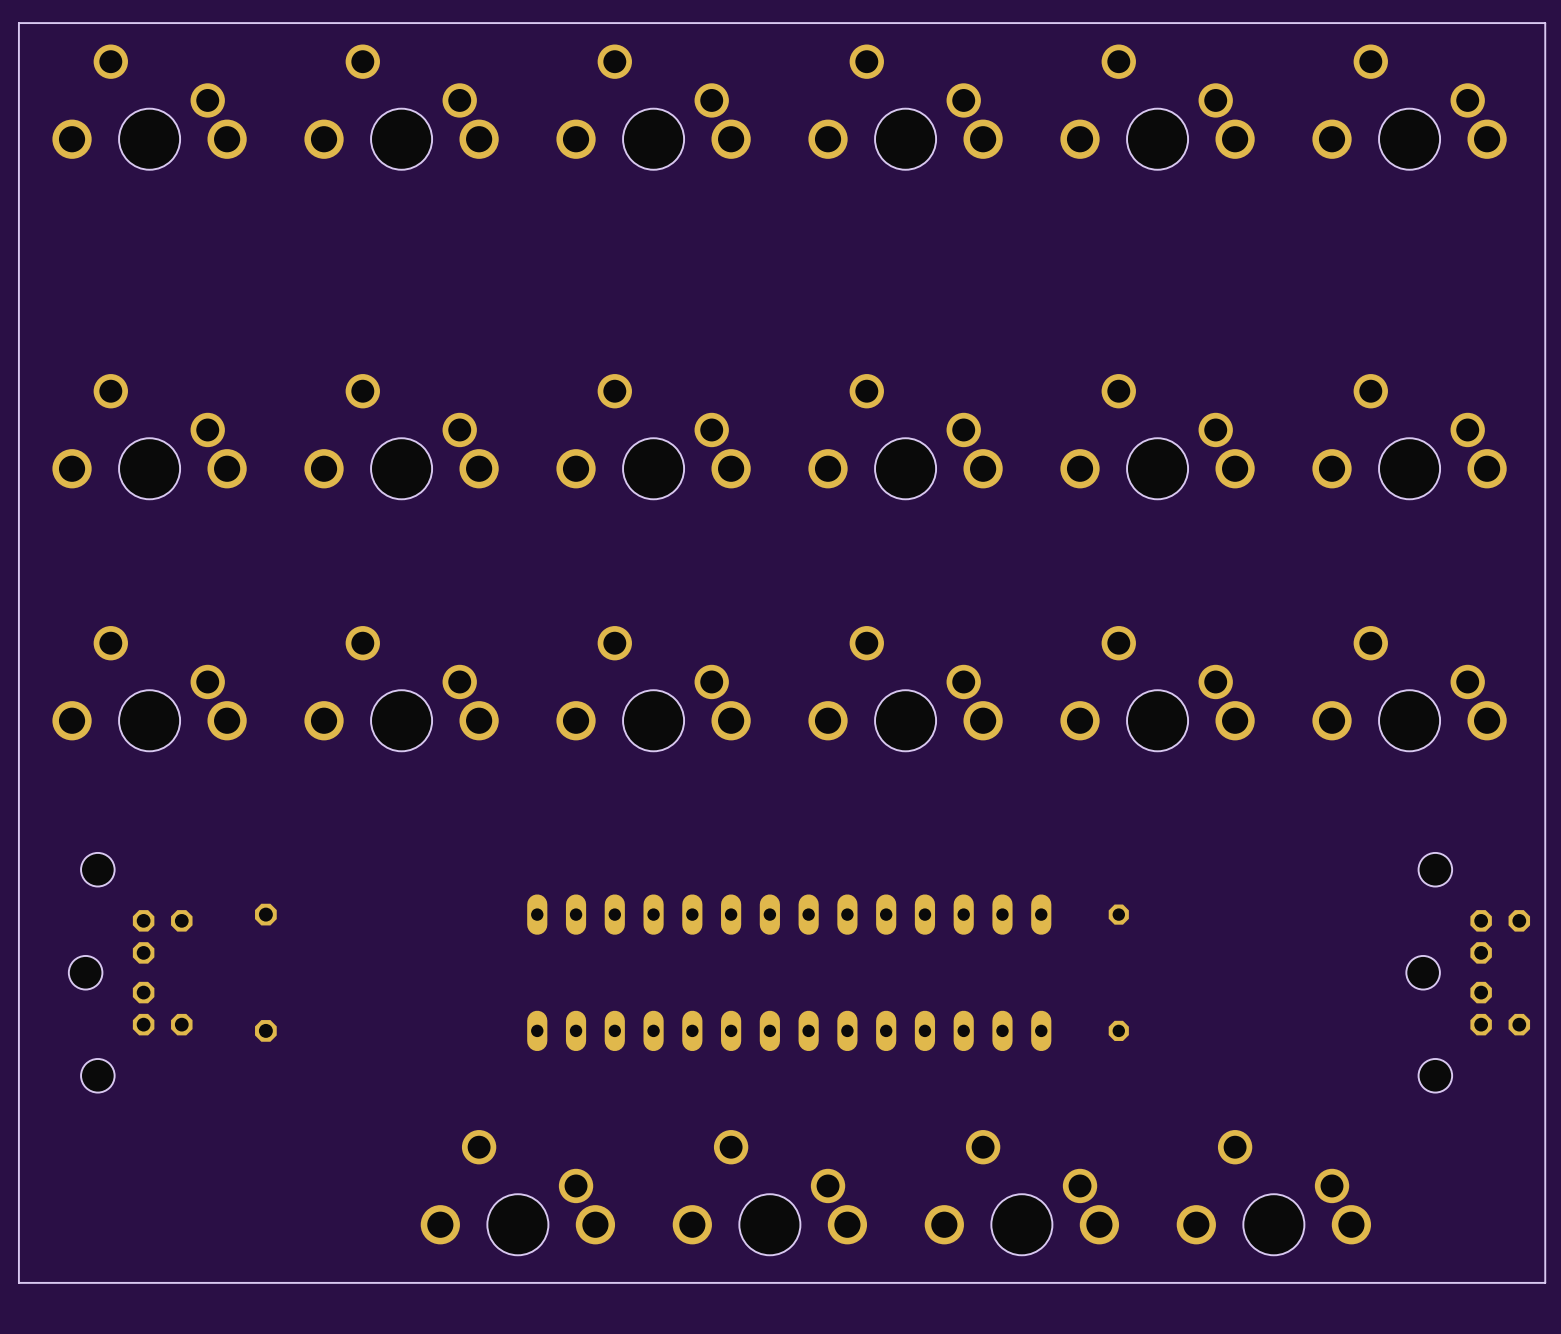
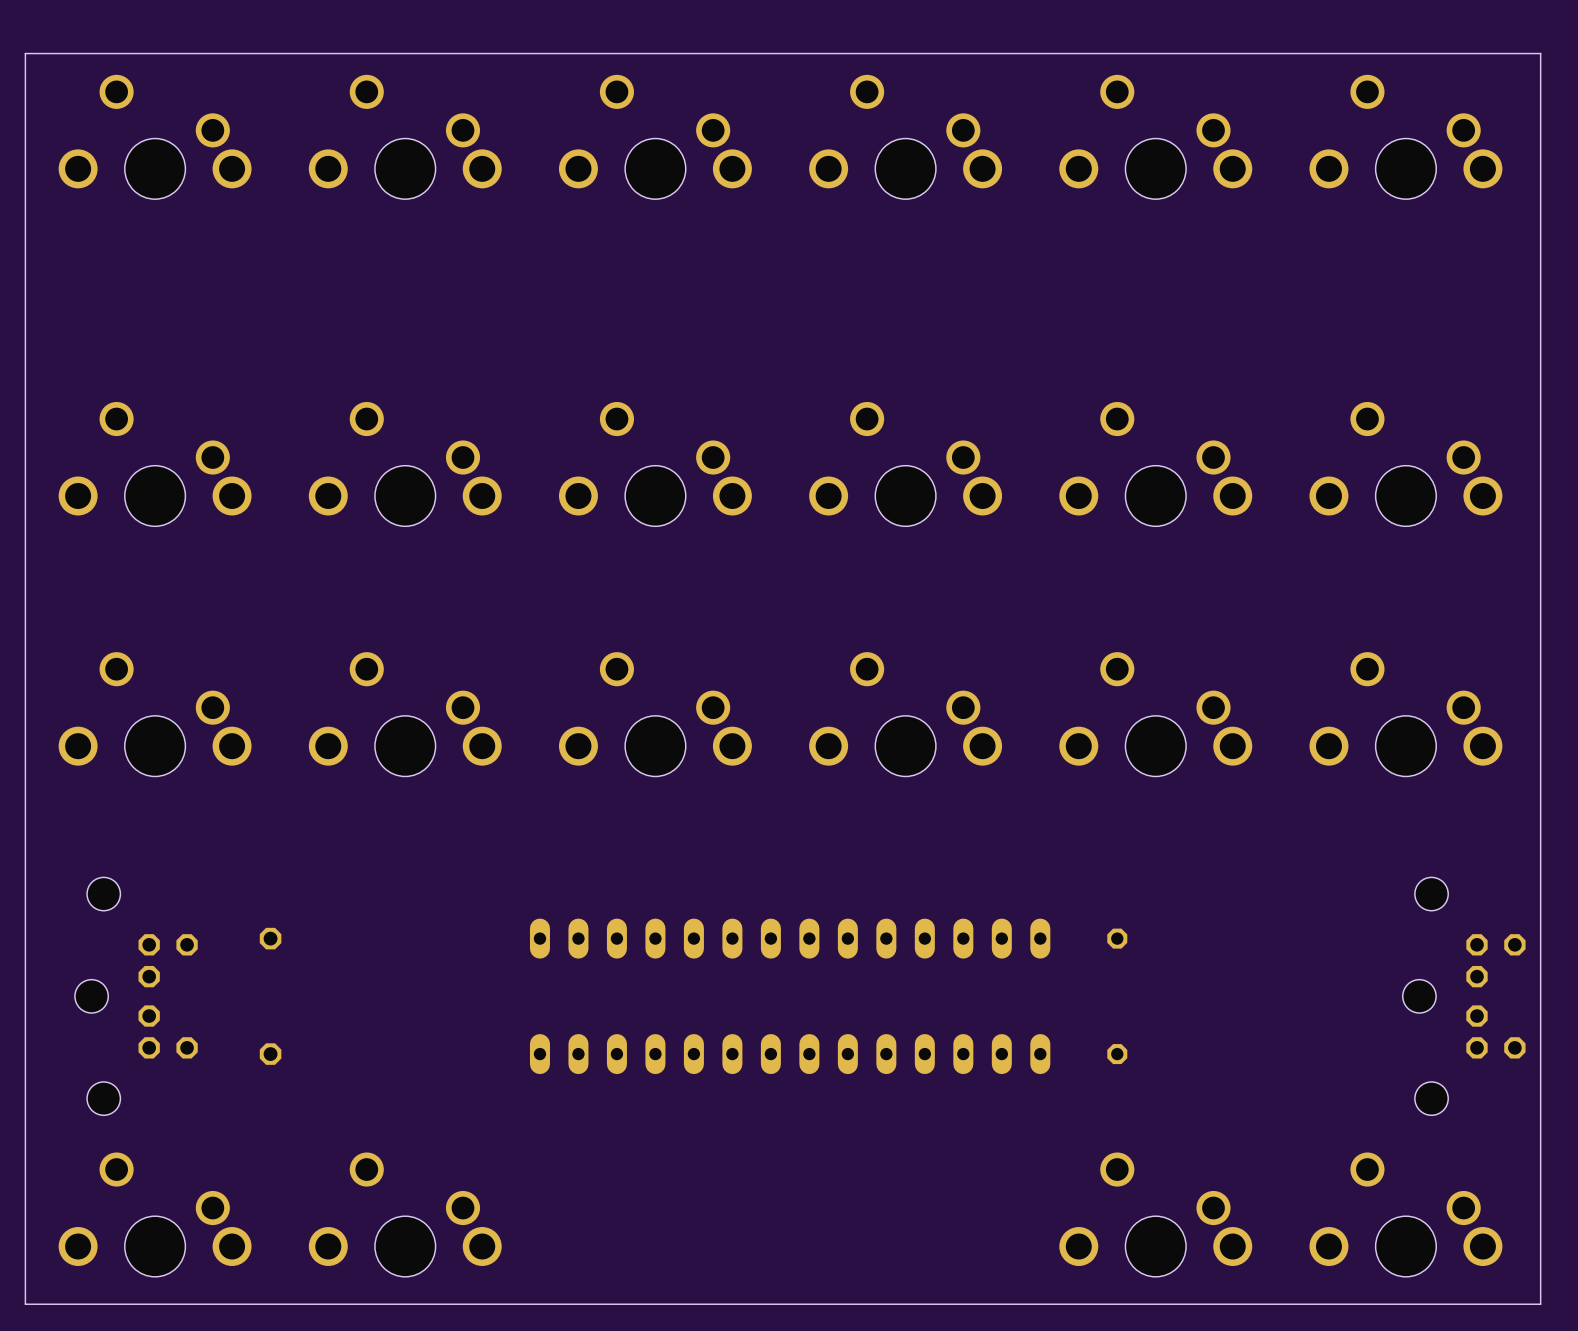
part: none -> (155, 1214)
part position: (517, 1192) -> (405, 1214)
part: (769, 1192) -> none
part: (1021, 1192) -> none
part: none -> (1155, 1214)
part: (1273, 1192) -> none
part: none -> (1405, 1214)

